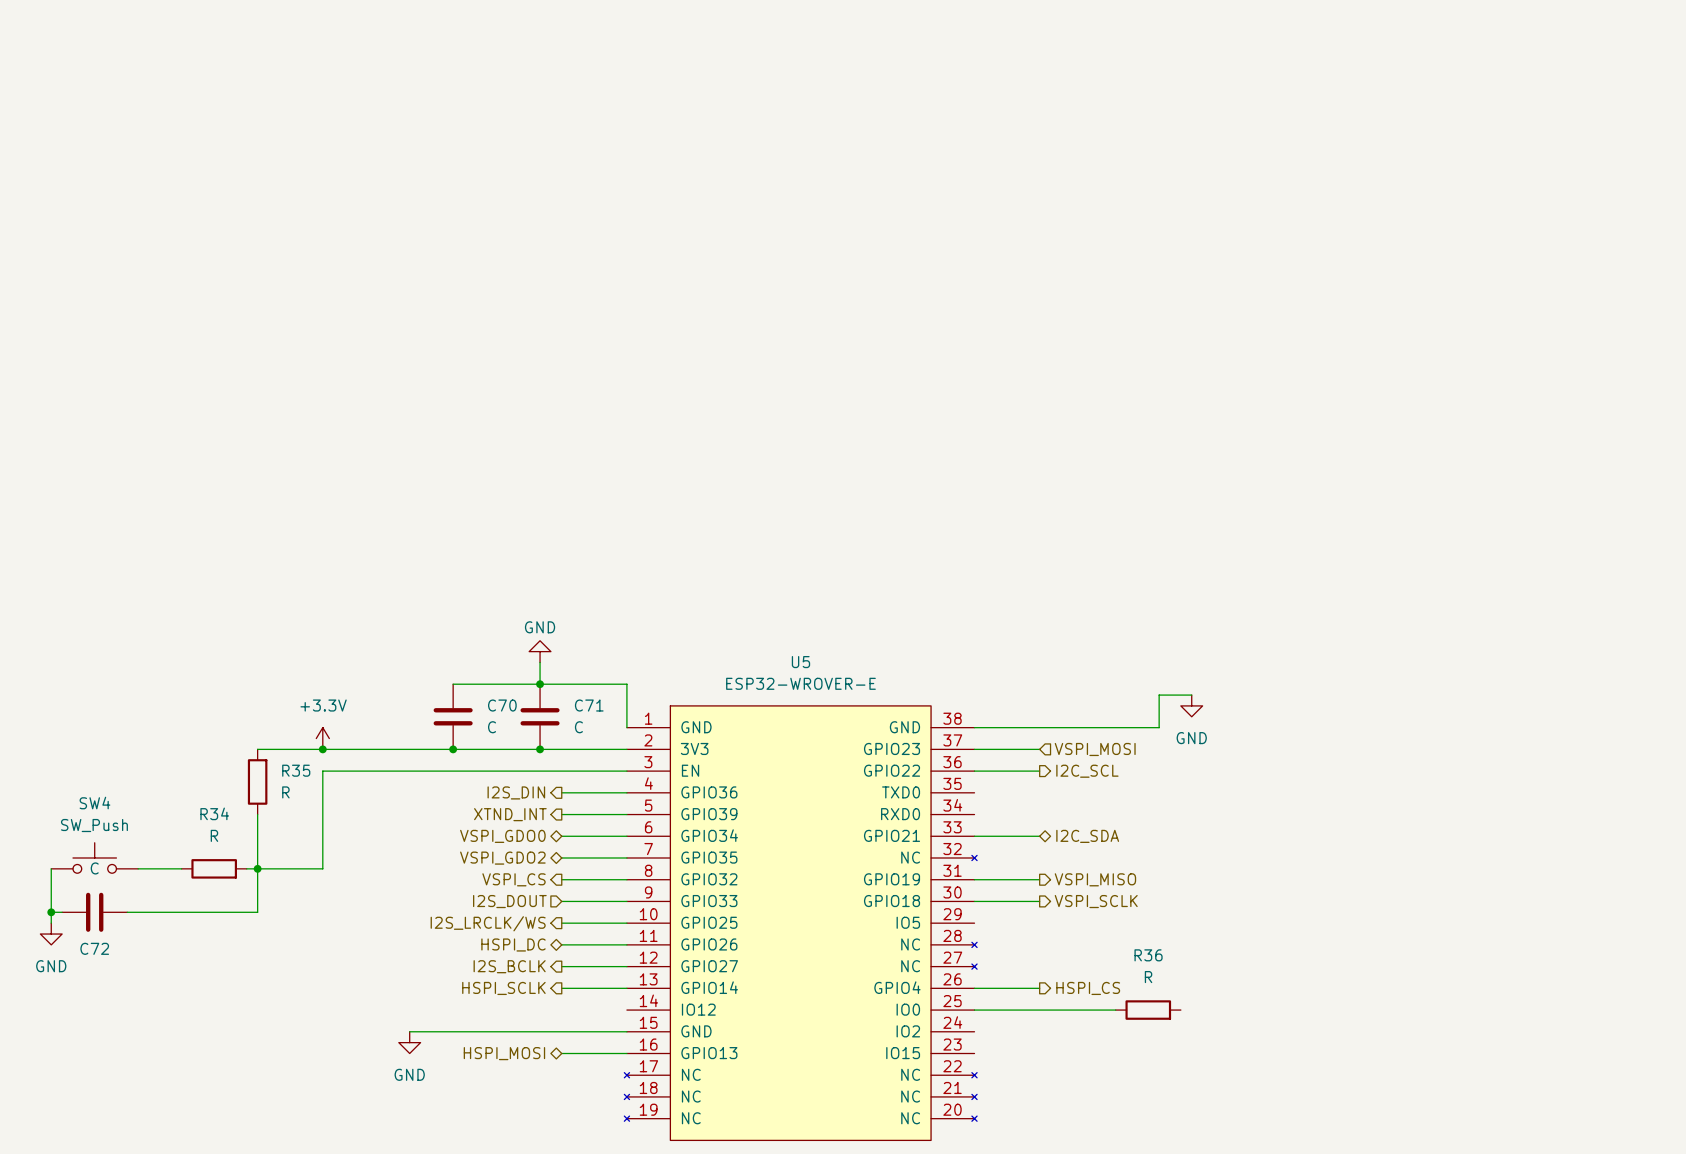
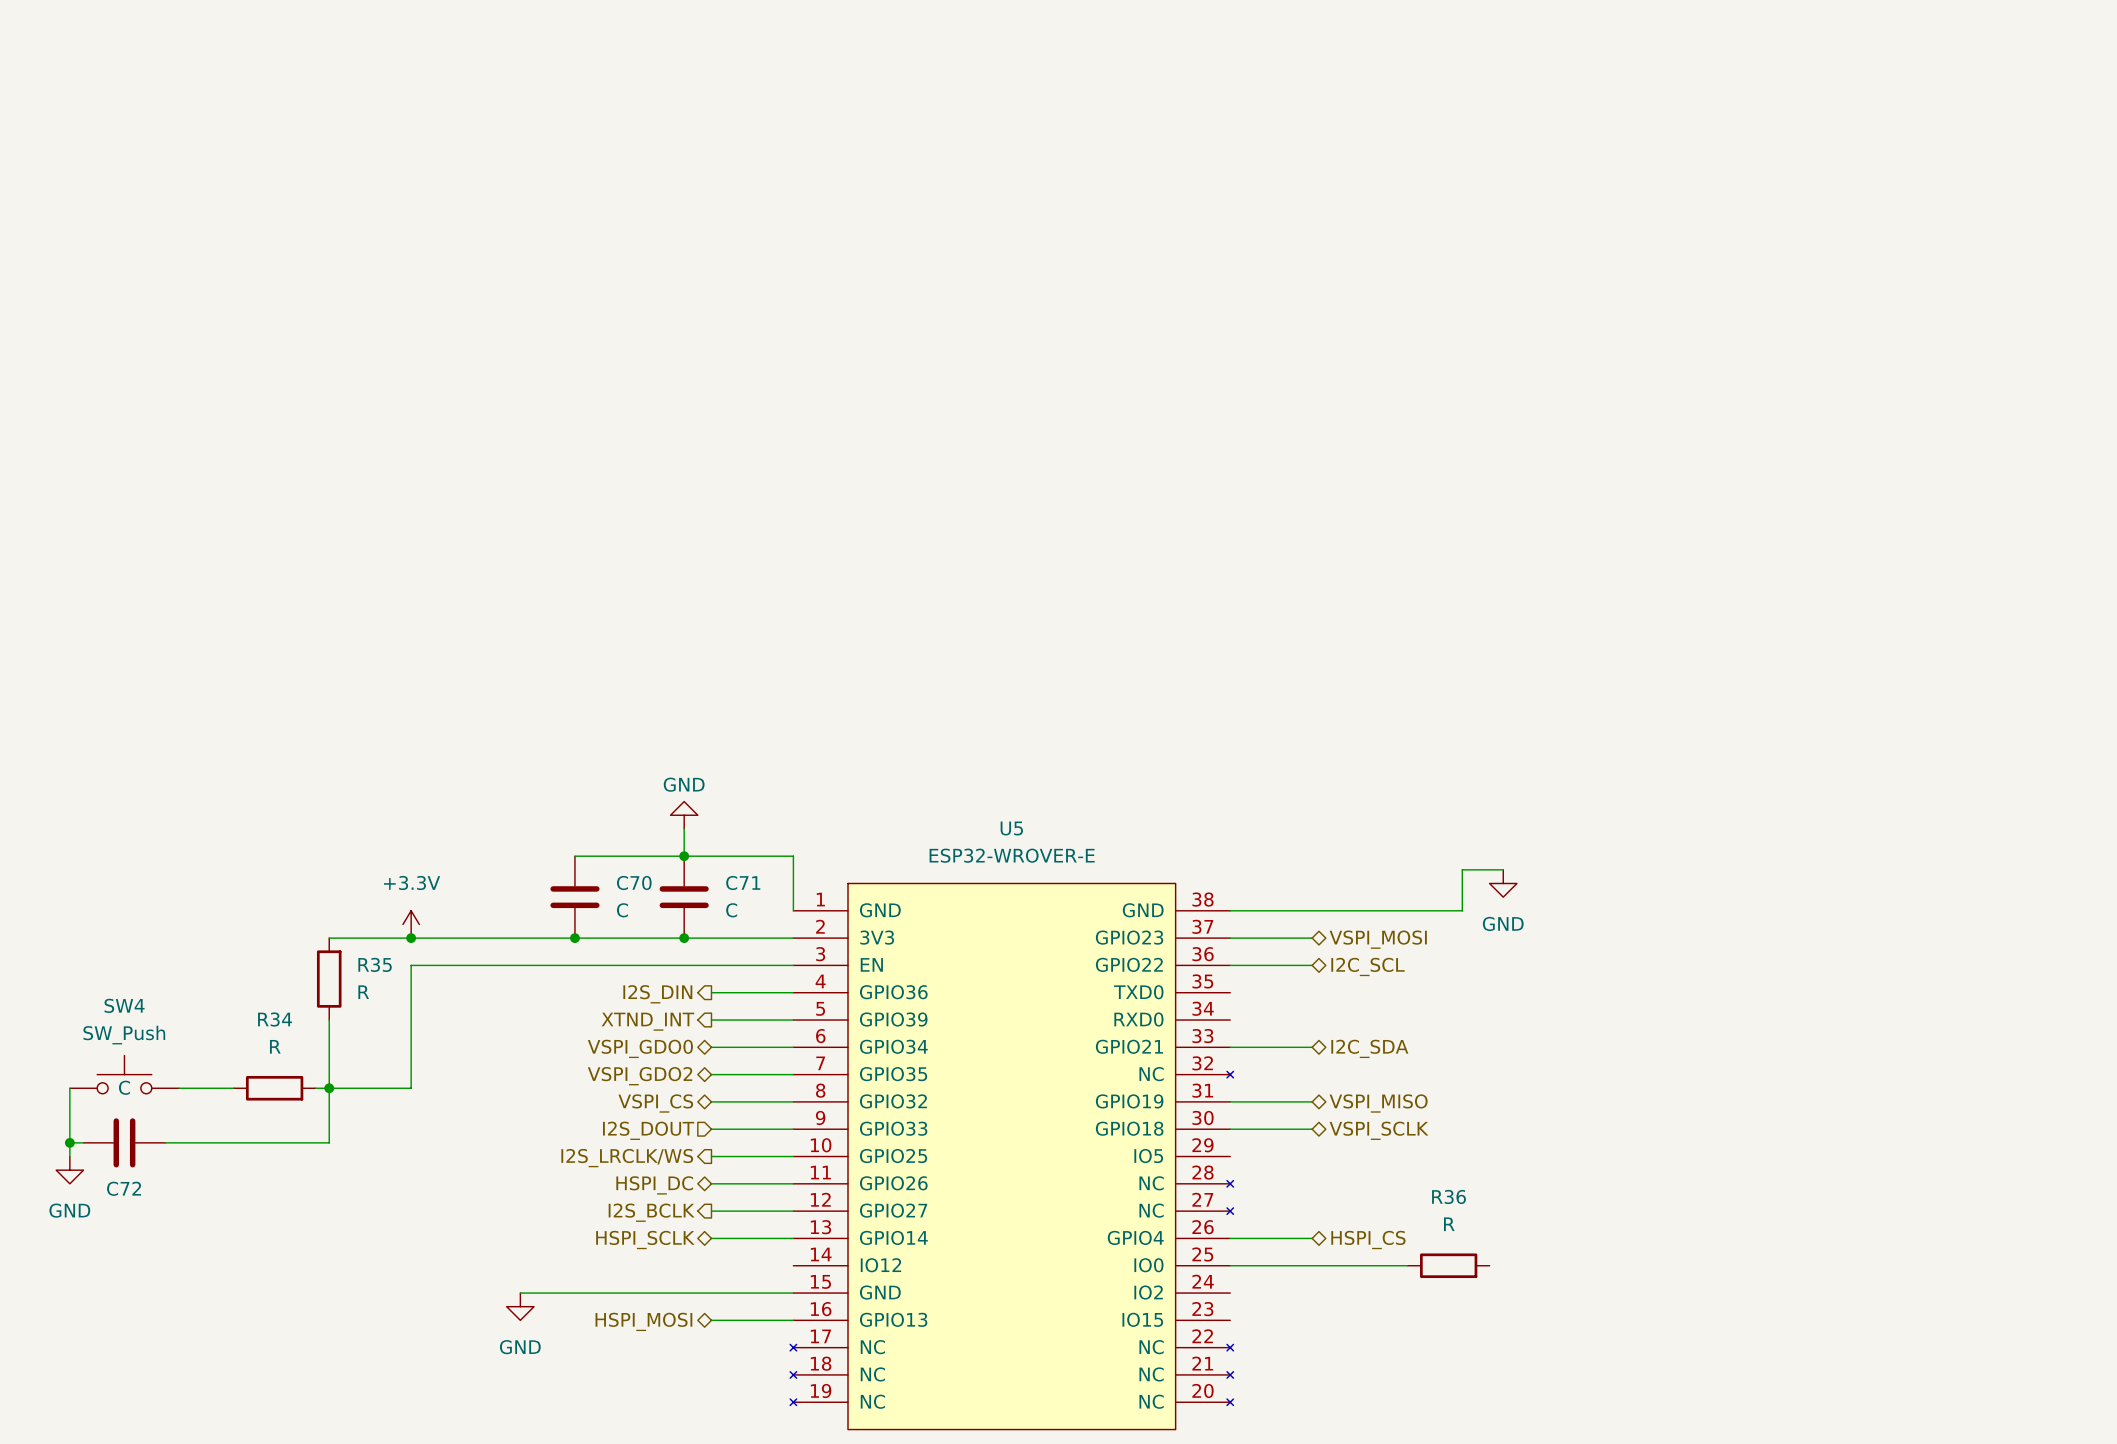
hierarchical label shape: input (1095, 749) -> bidirectional (1378, 939)
hierarchical label shape: output (1087, 771) -> bidirectional (1367, 966)
hierarchical label shape: output (514, 879) -> bidirectional (655, 1103)
hierarchical label shape: output (1095, 879) -> bidirectional (1378, 1103)
hierarchical label shape: output (1096, 901) -> bidirectional (1379, 1130)
hierarchical label shape: output (503, 988) -> bidirectional (645, 1240)
hierarchical label shape: output (1088, 988) -> bidirectional (1368, 1240)

